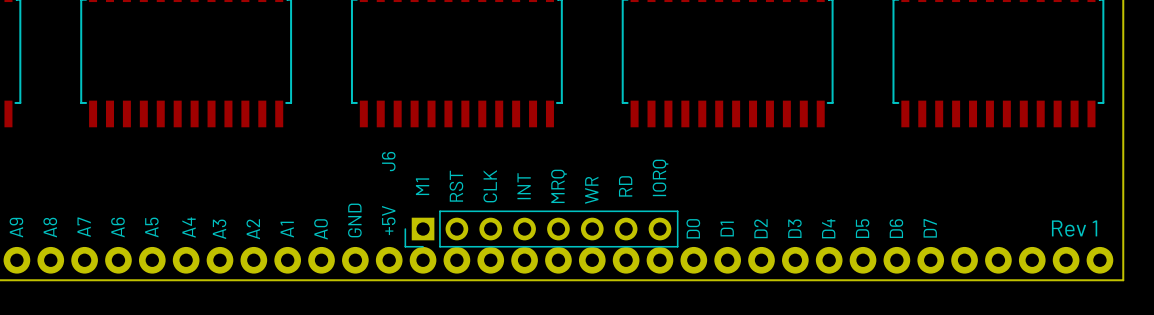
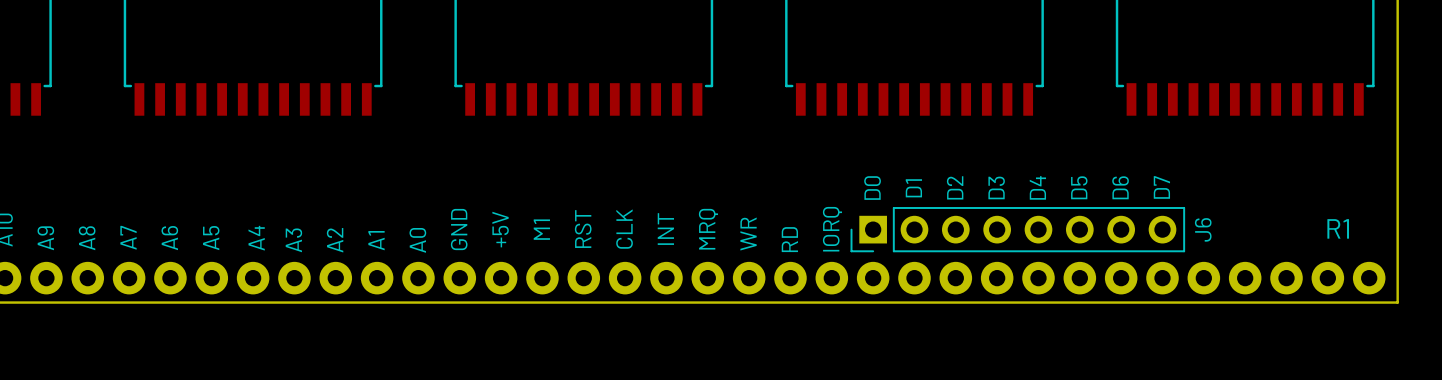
J6 name position: J6 (388, 161) -> J6 (1203, 229)
text position: IORQ (660, 177) -> IORQ (832, 229)
text position: M1 (422, 186) -> M1 (541, 229)
text position: RST (456, 186) -> RST (583, 229)
text position: CLK (490, 186) -> CLK (624, 229)
text position: INT (524, 186) -> INT (665, 229)
text position: MRQ (558, 186) -> MRQ (708, 229)
text position: RD (625, 186) -> RD (789, 239)
text position: WR (591, 190) -> WR (748, 234)
text position: D0 (693, 228) -> D0 (872, 188)
text position: D2 (760, 228) -> D2 (955, 187)
text position: D3 (794, 228) -> D3 (996, 187)
text position: D4 (828, 228) -> D4 (1037, 187)
text position: D5 (862, 228) -> D5 (1079, 187)
text position: D6 (896, 228) -> D6 (1120, 187)
text position: D7 (930, 228) -> D7 (1161, 187)
text: Rev 1 (1074, 228) -> R1 (1338, 228)
J6 position: (541, 229) -> (1017, 229)
text position: D1 (727, 229) -> D1 (913, 188)

